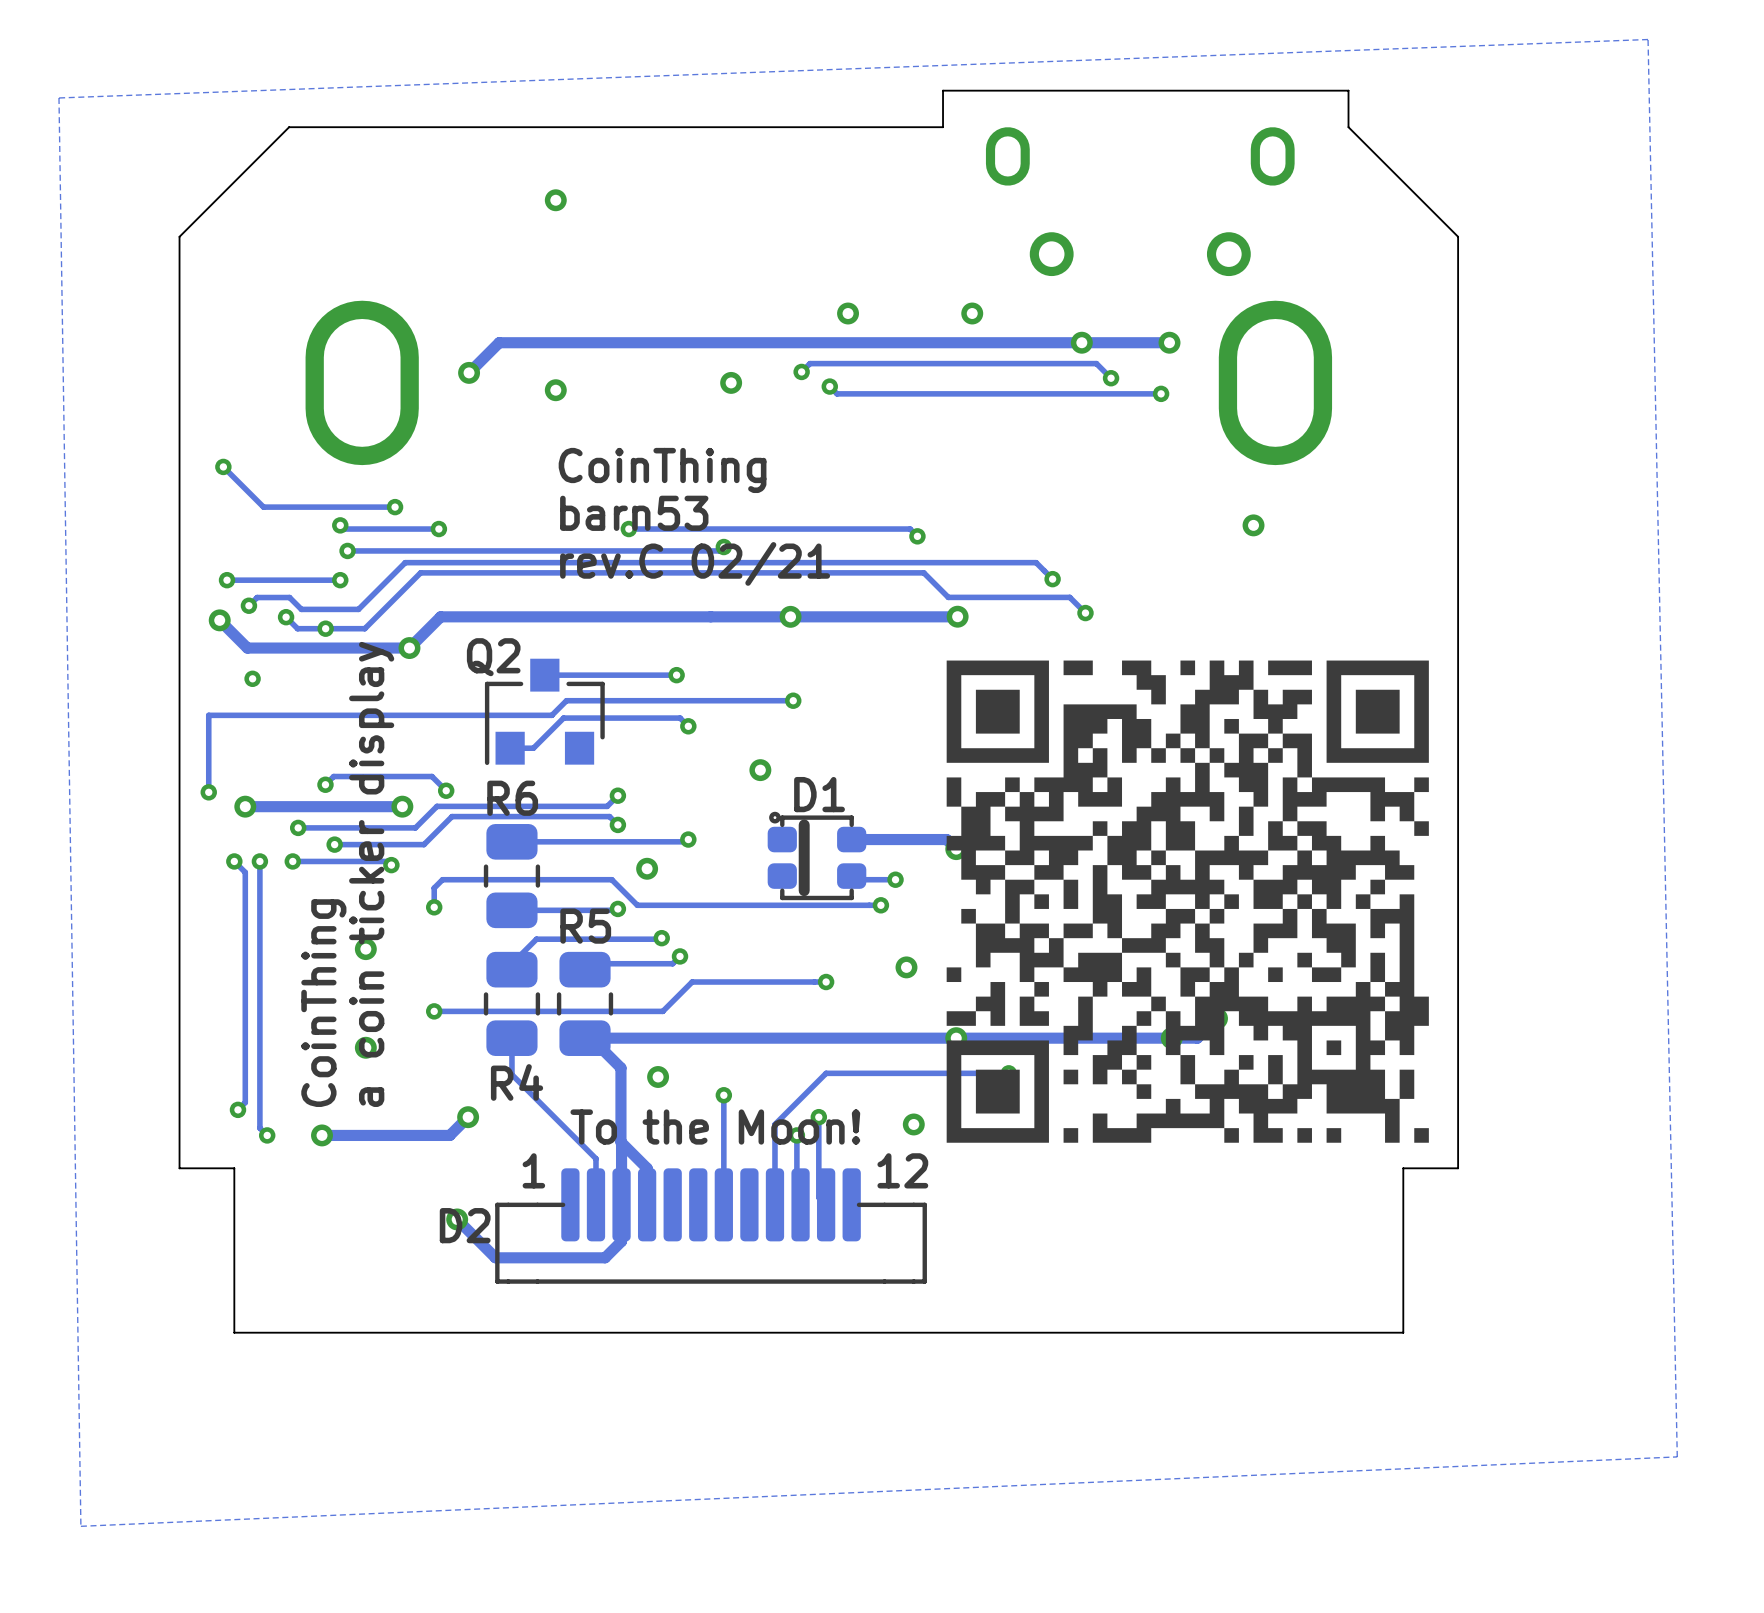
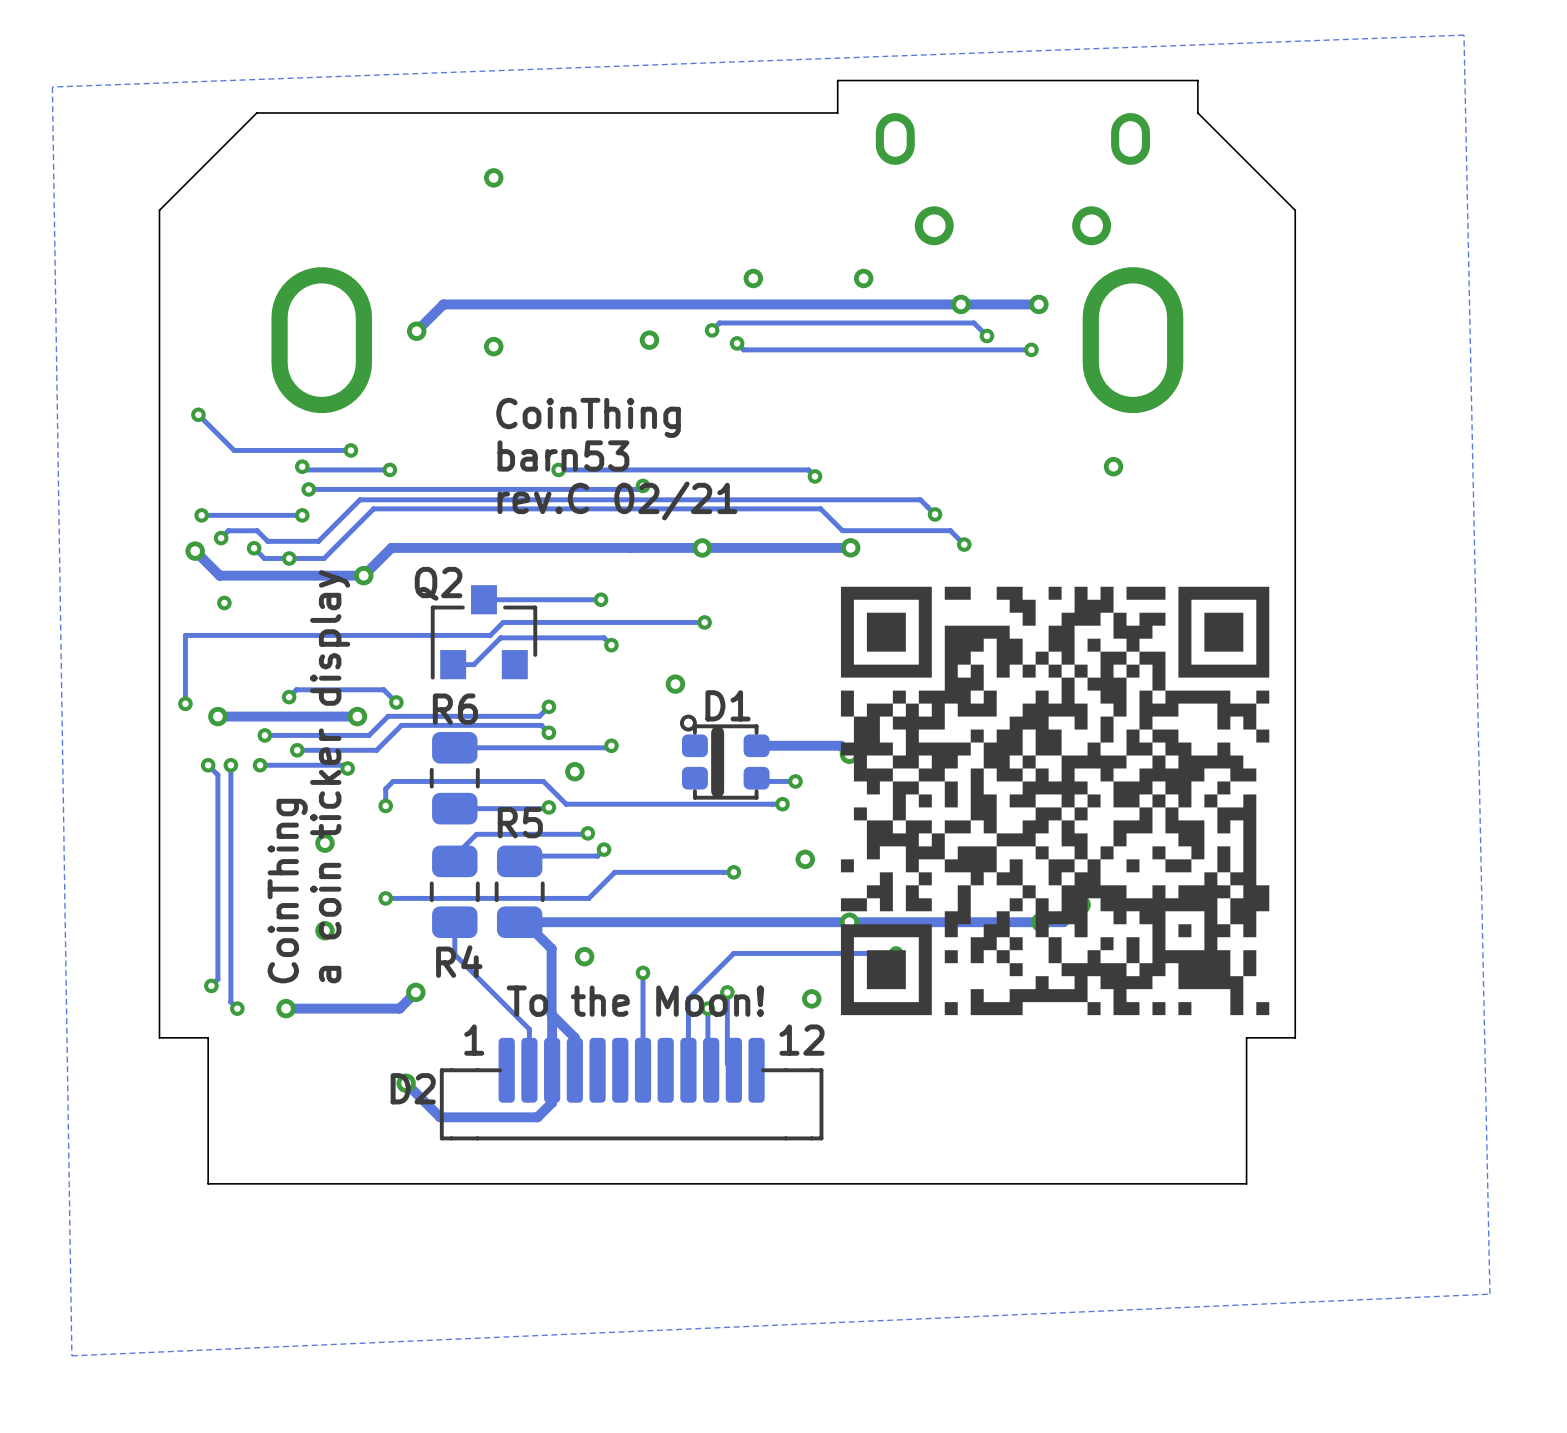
D1 footprint: [767, 811, 867, 901] -> [679, 714, 770, 800]

